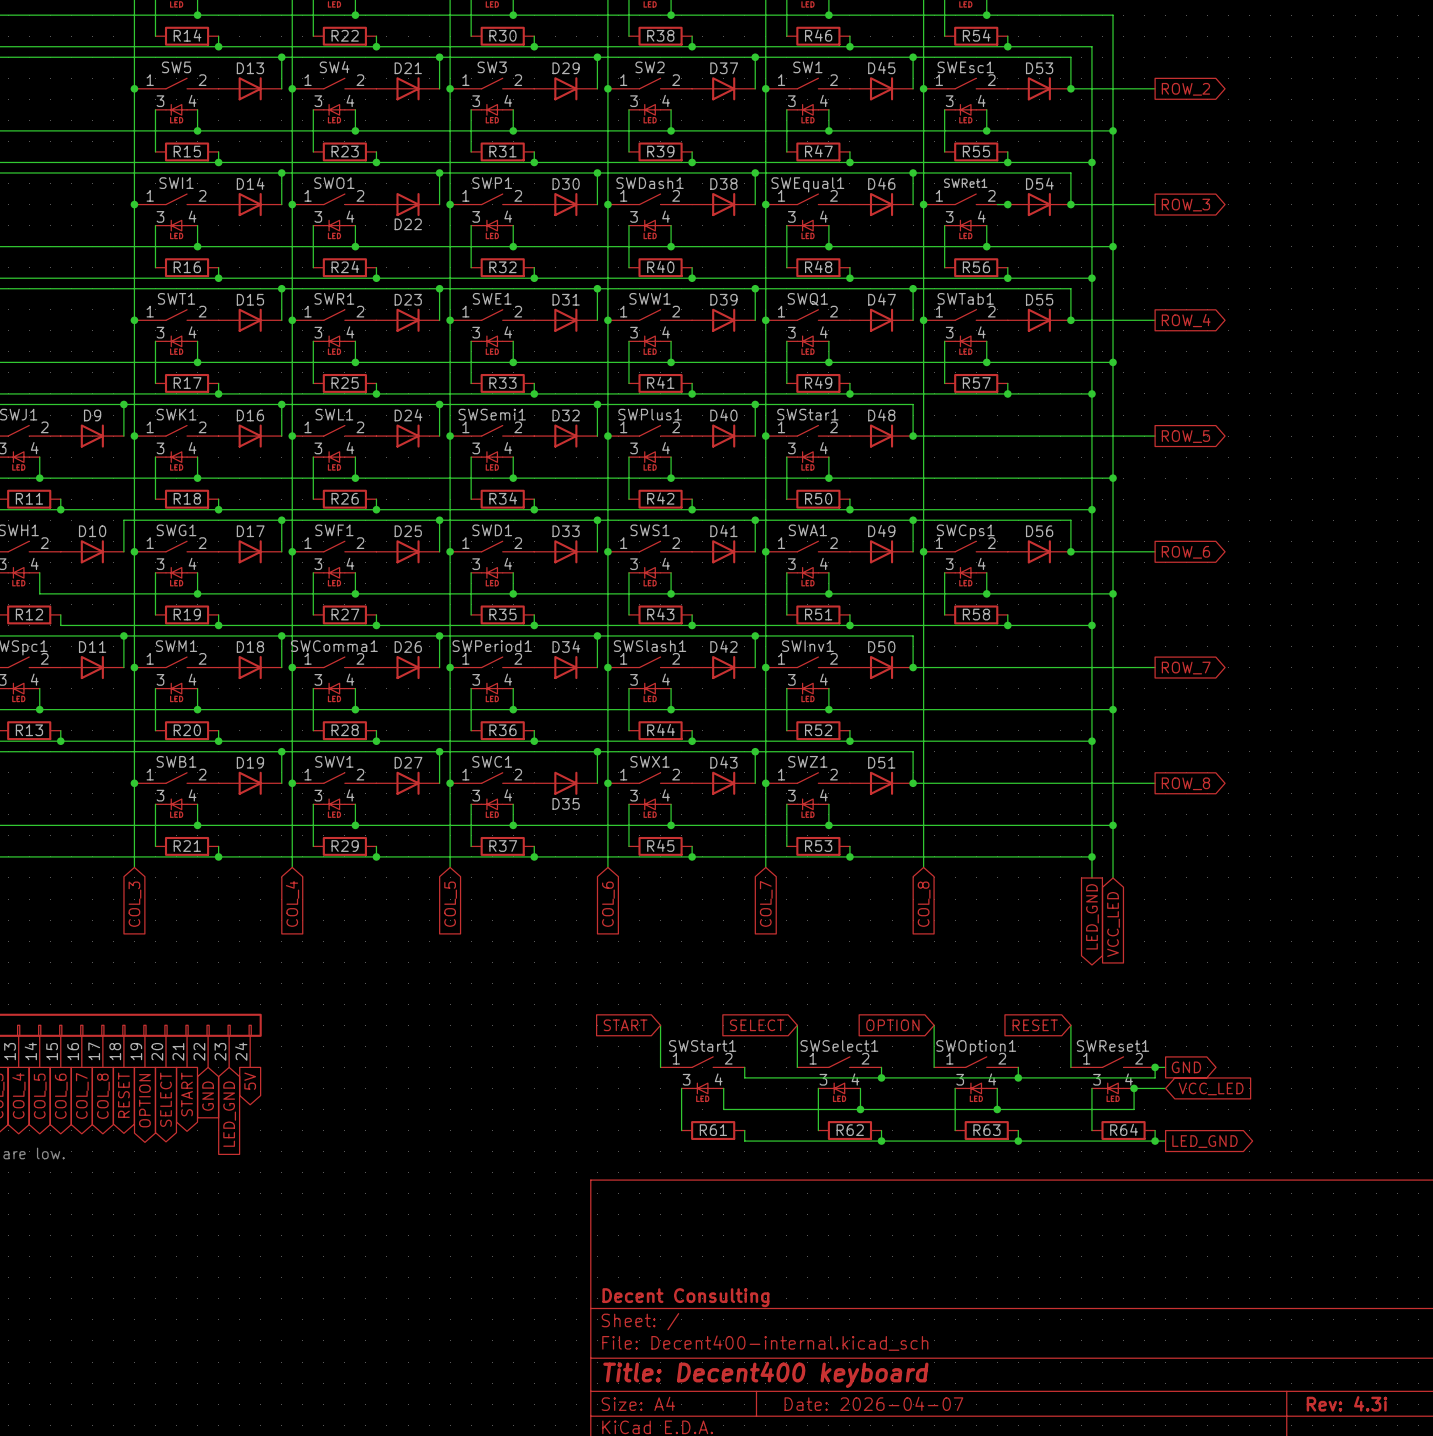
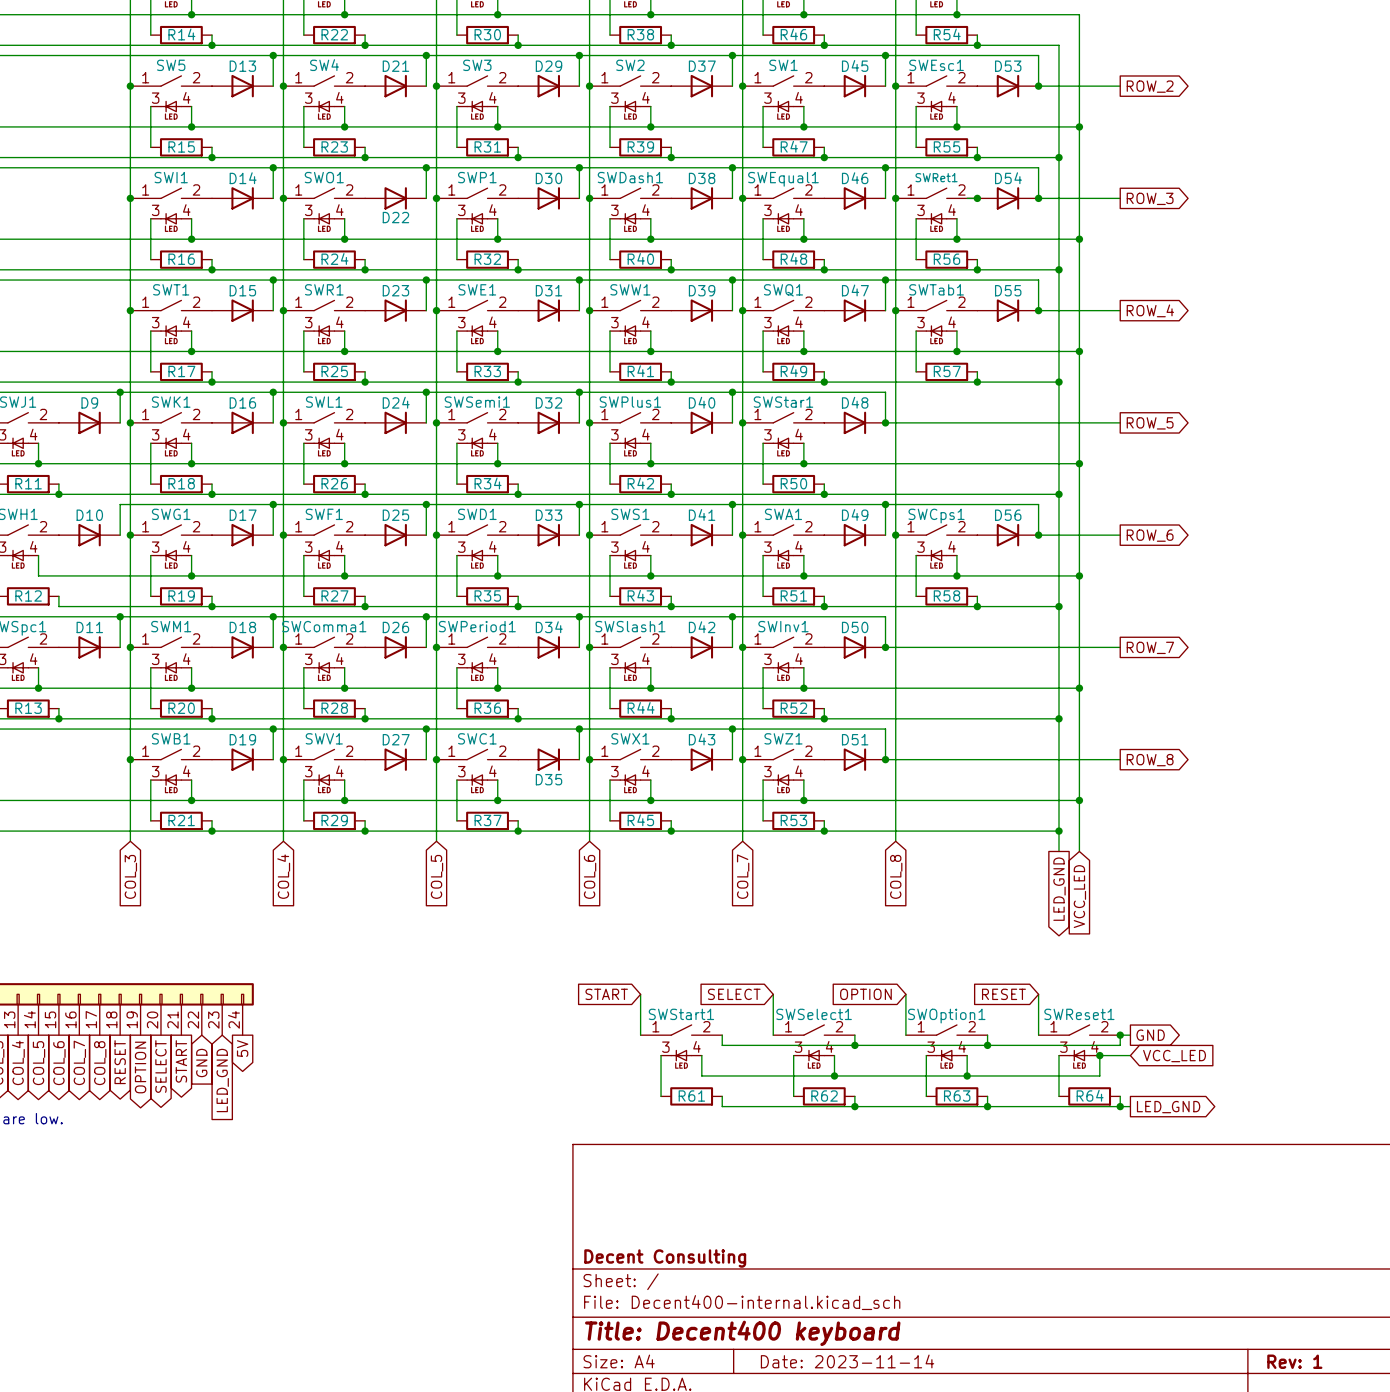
title block: Date: 2026-04-07 (873, 1403) -> Date: 2023-11-14 (847, 1361)
title block: Rev: 4.3i (1346, 1403) -> Rev: 1 (1294, 1361)

